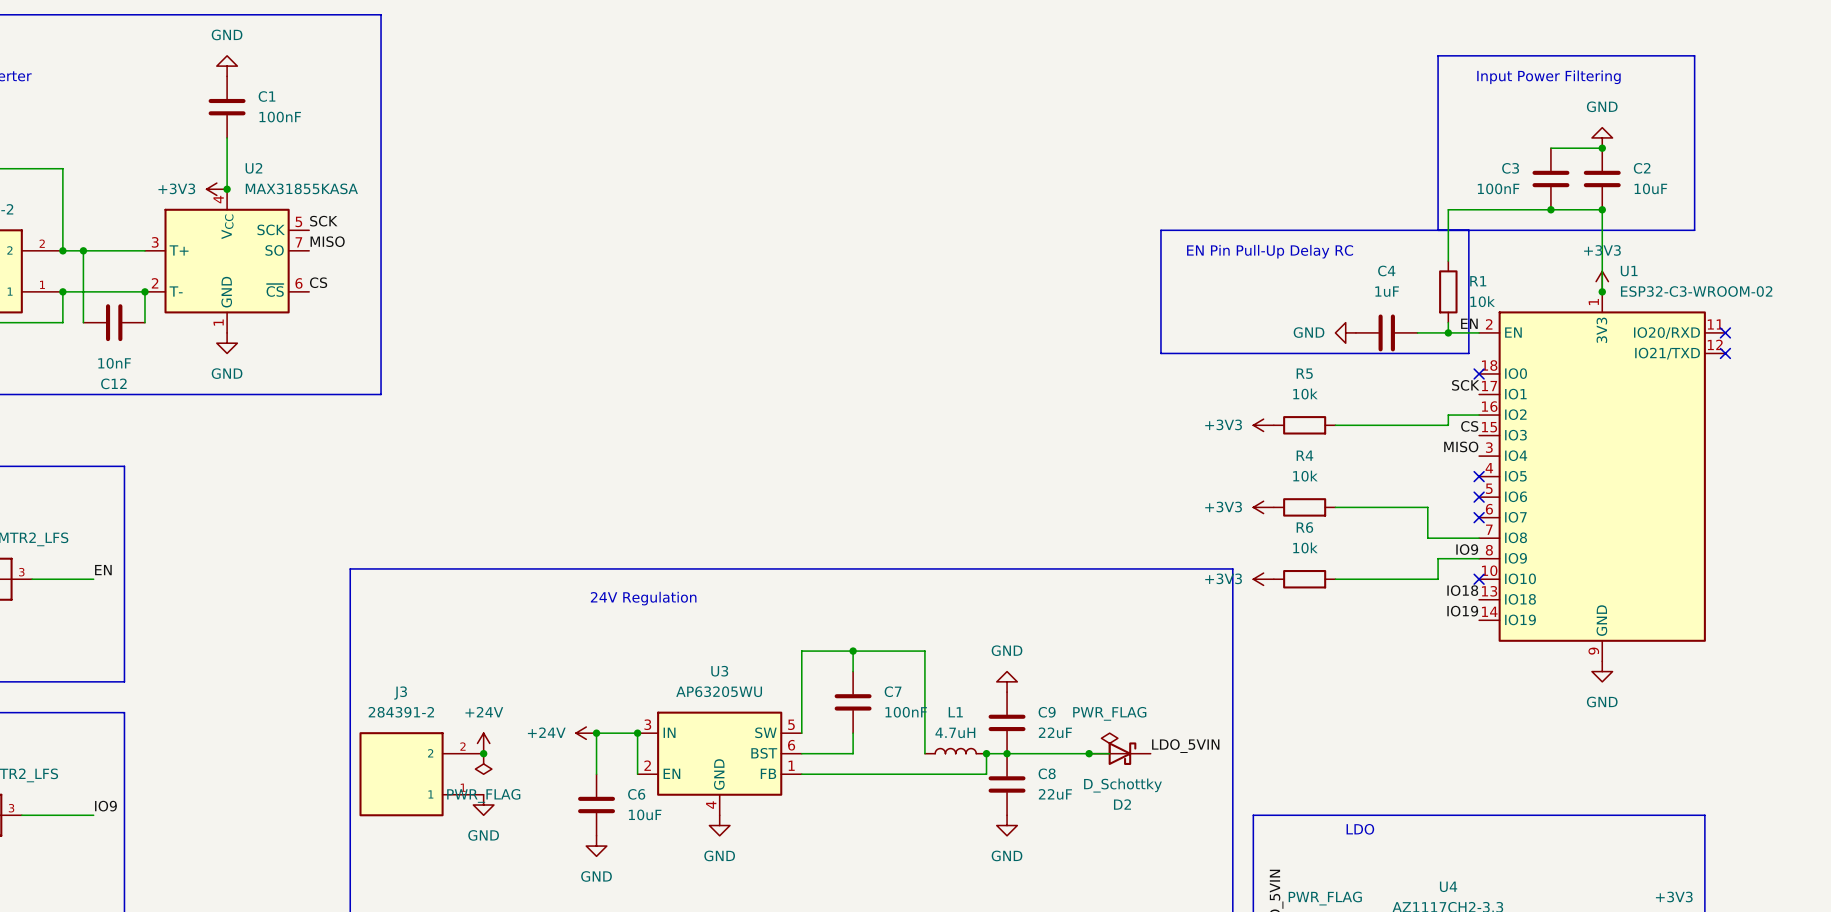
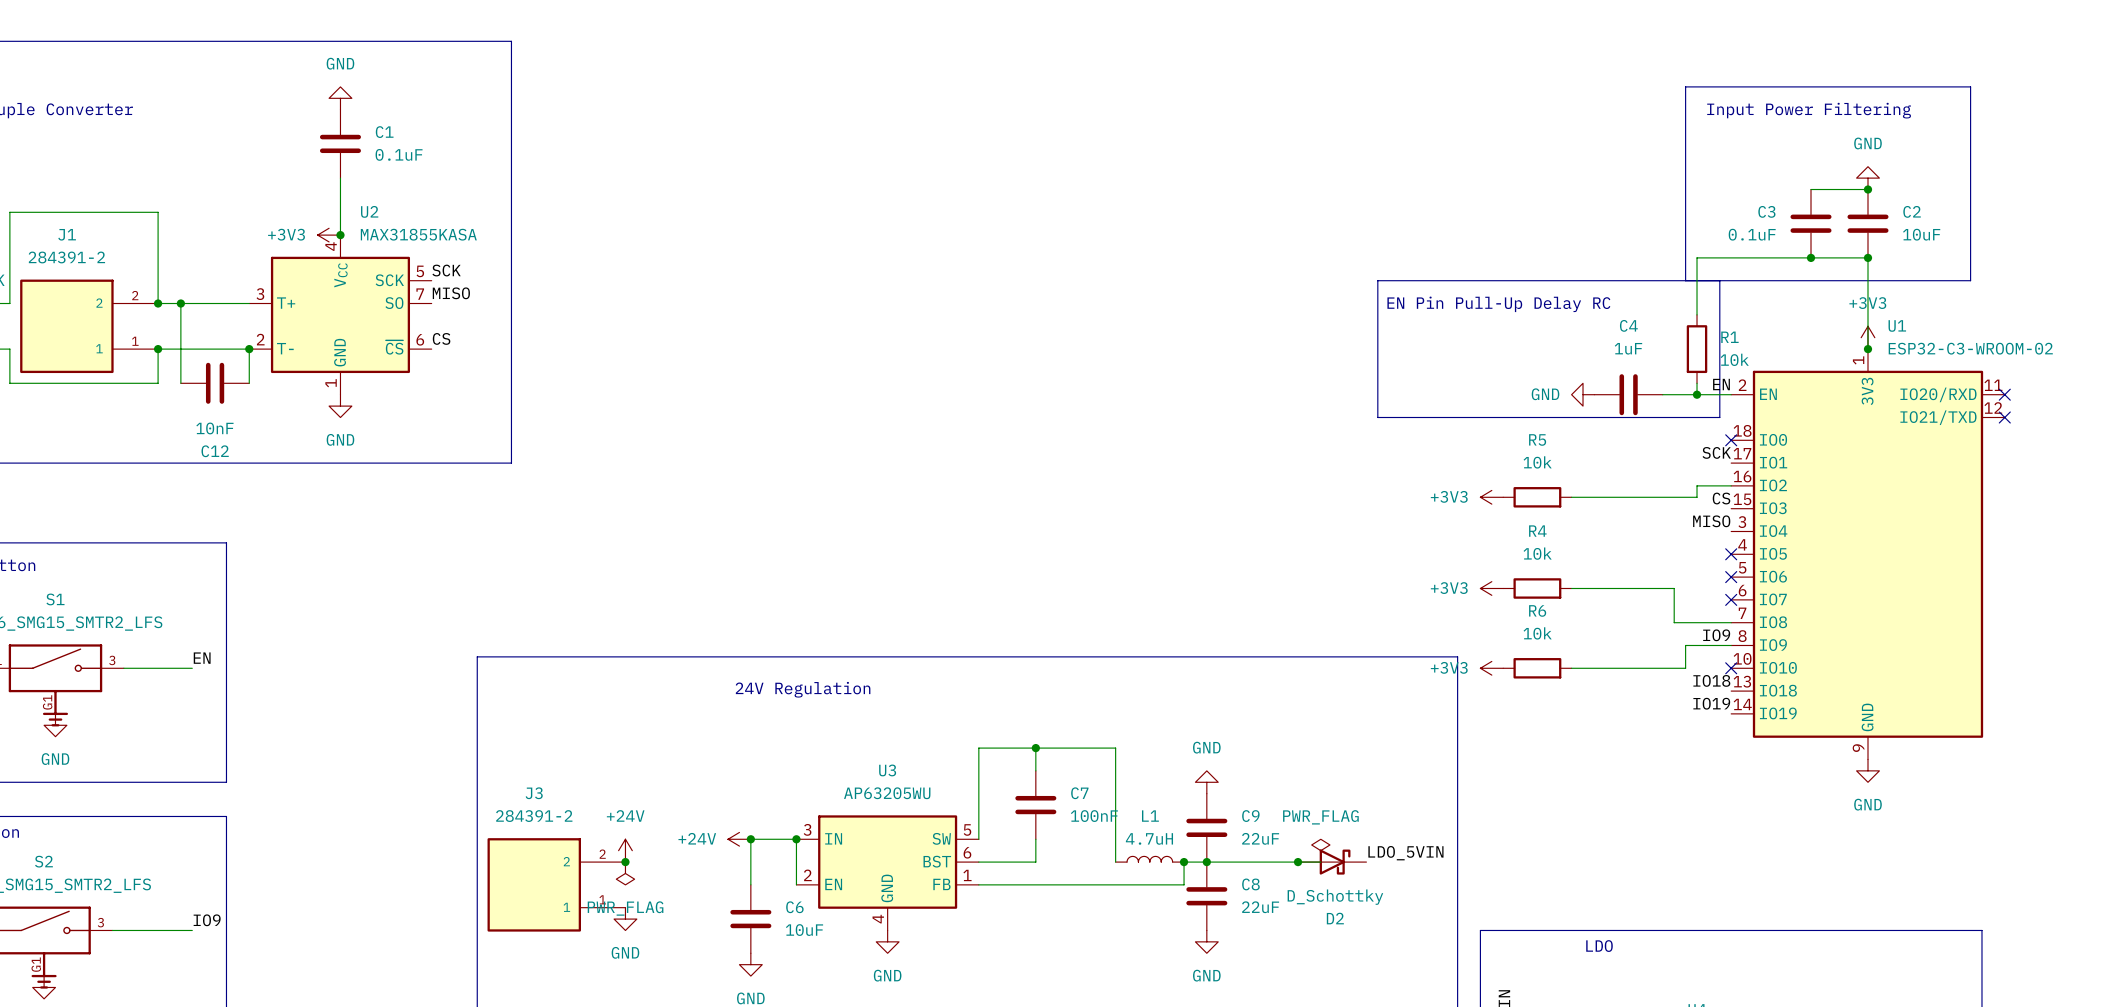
C1 value: 100nF (280, 117) -> 0.1uF (399, 154)
C3 value: 100nF (1498, 188) -> 0.1uF (1752, 234)

